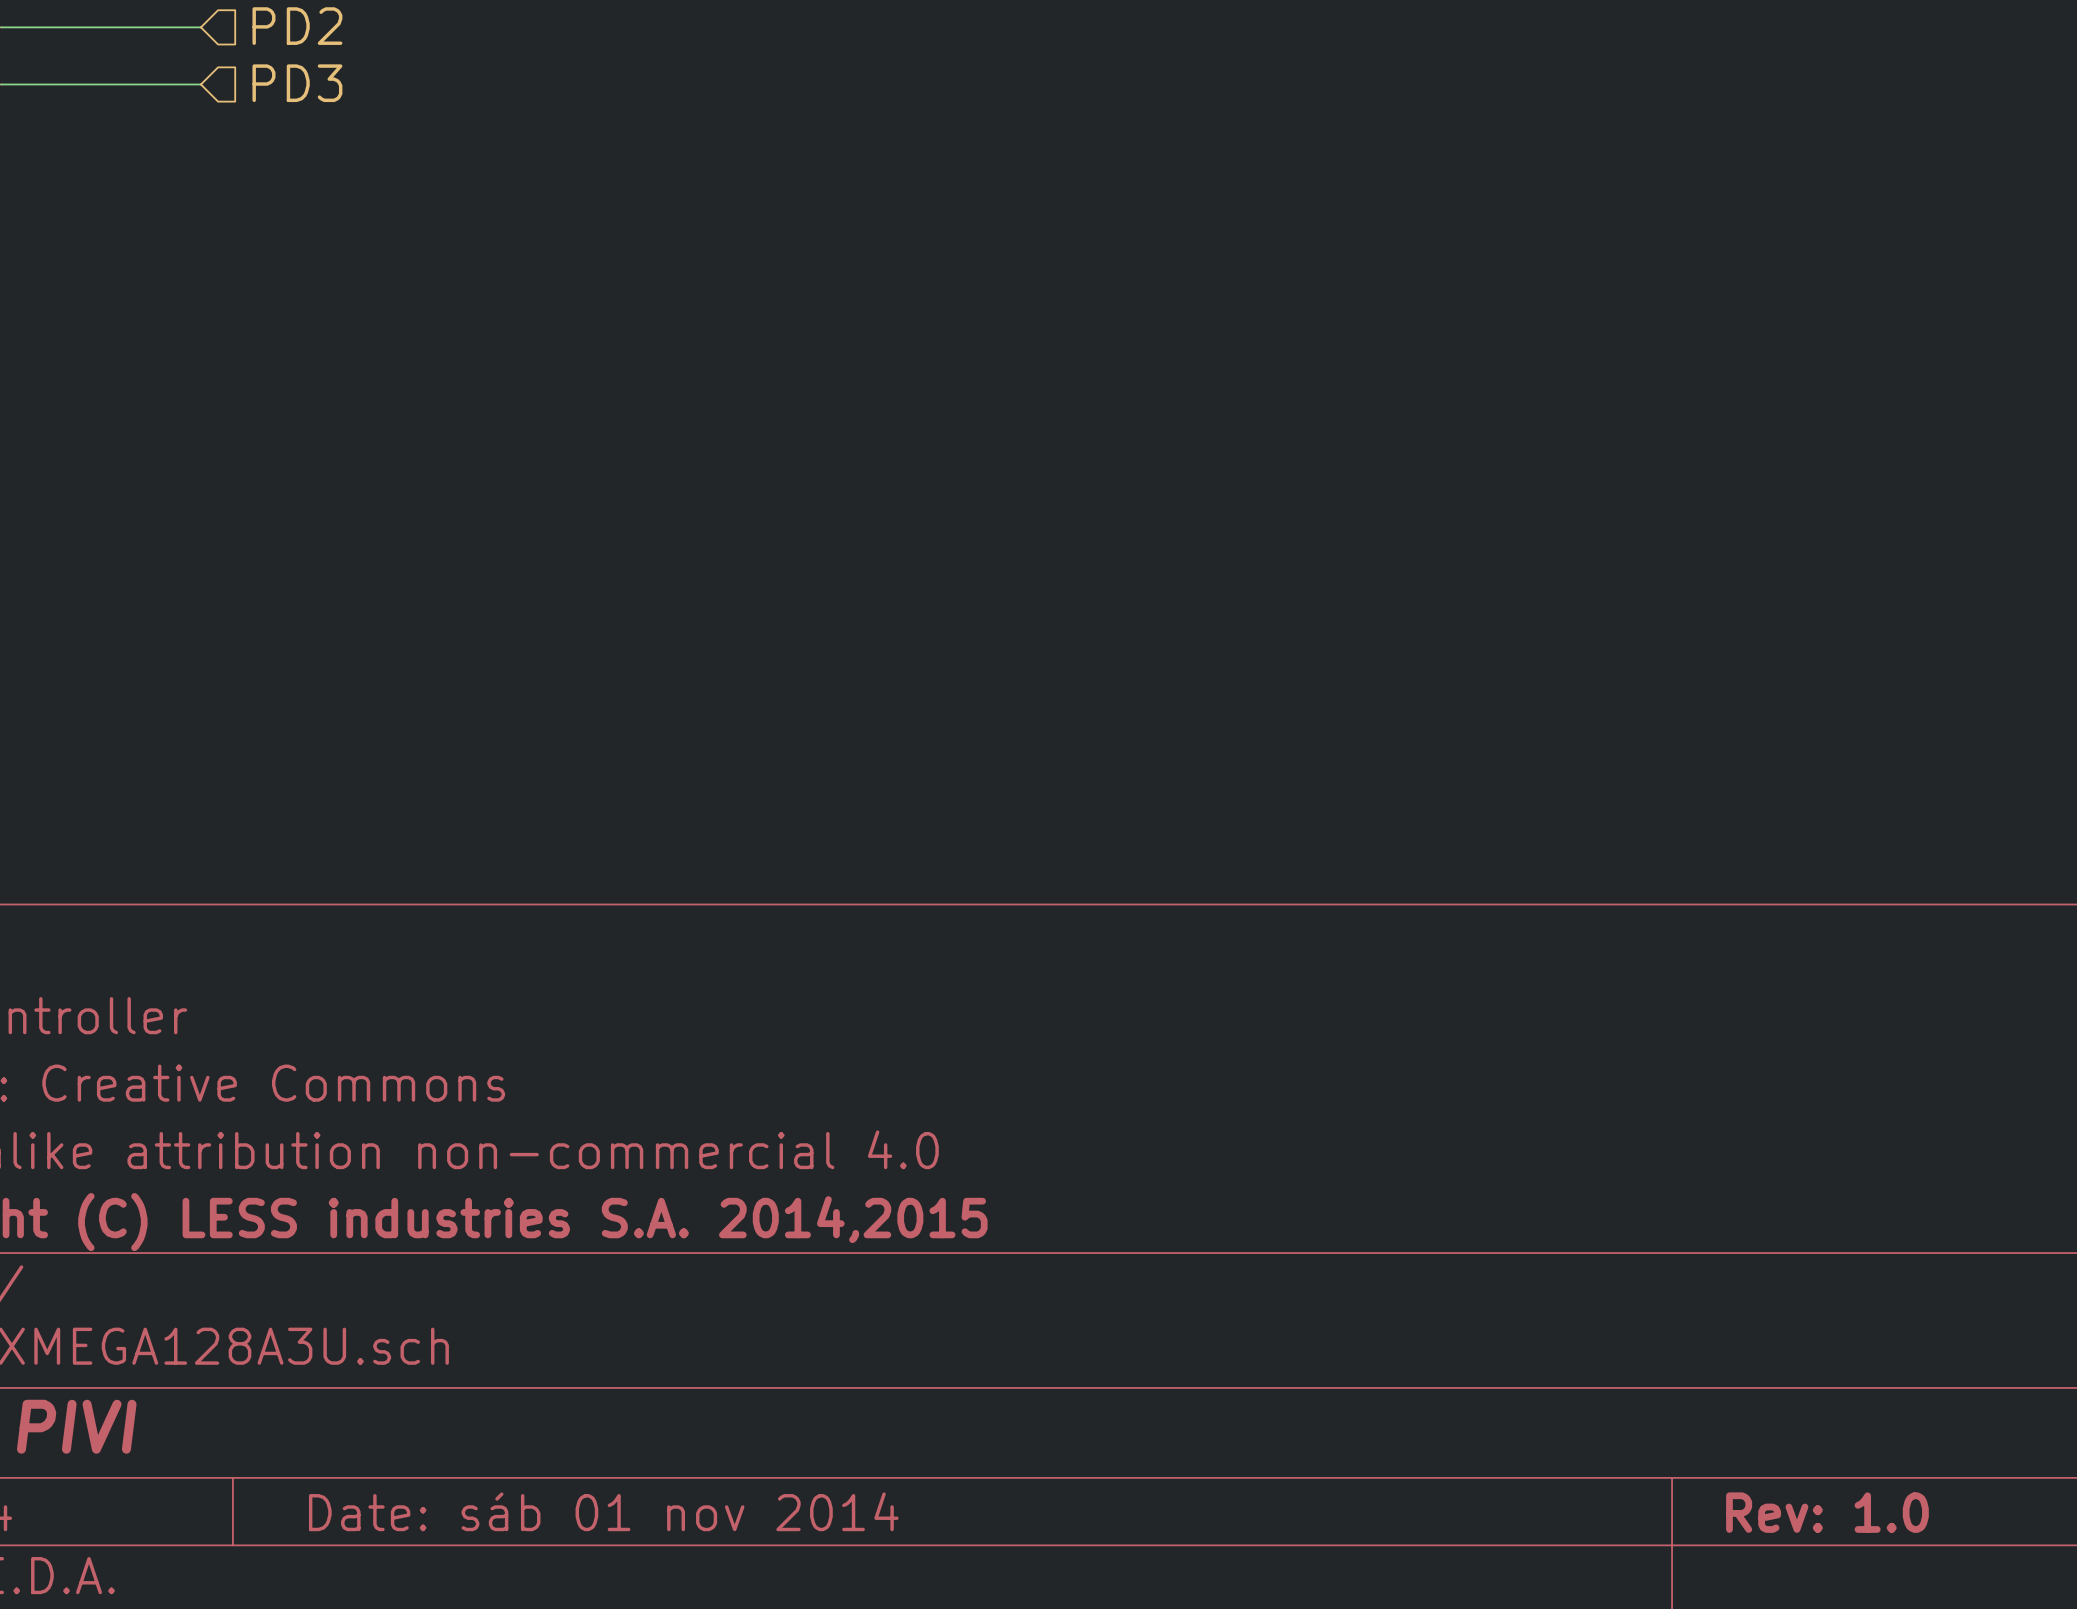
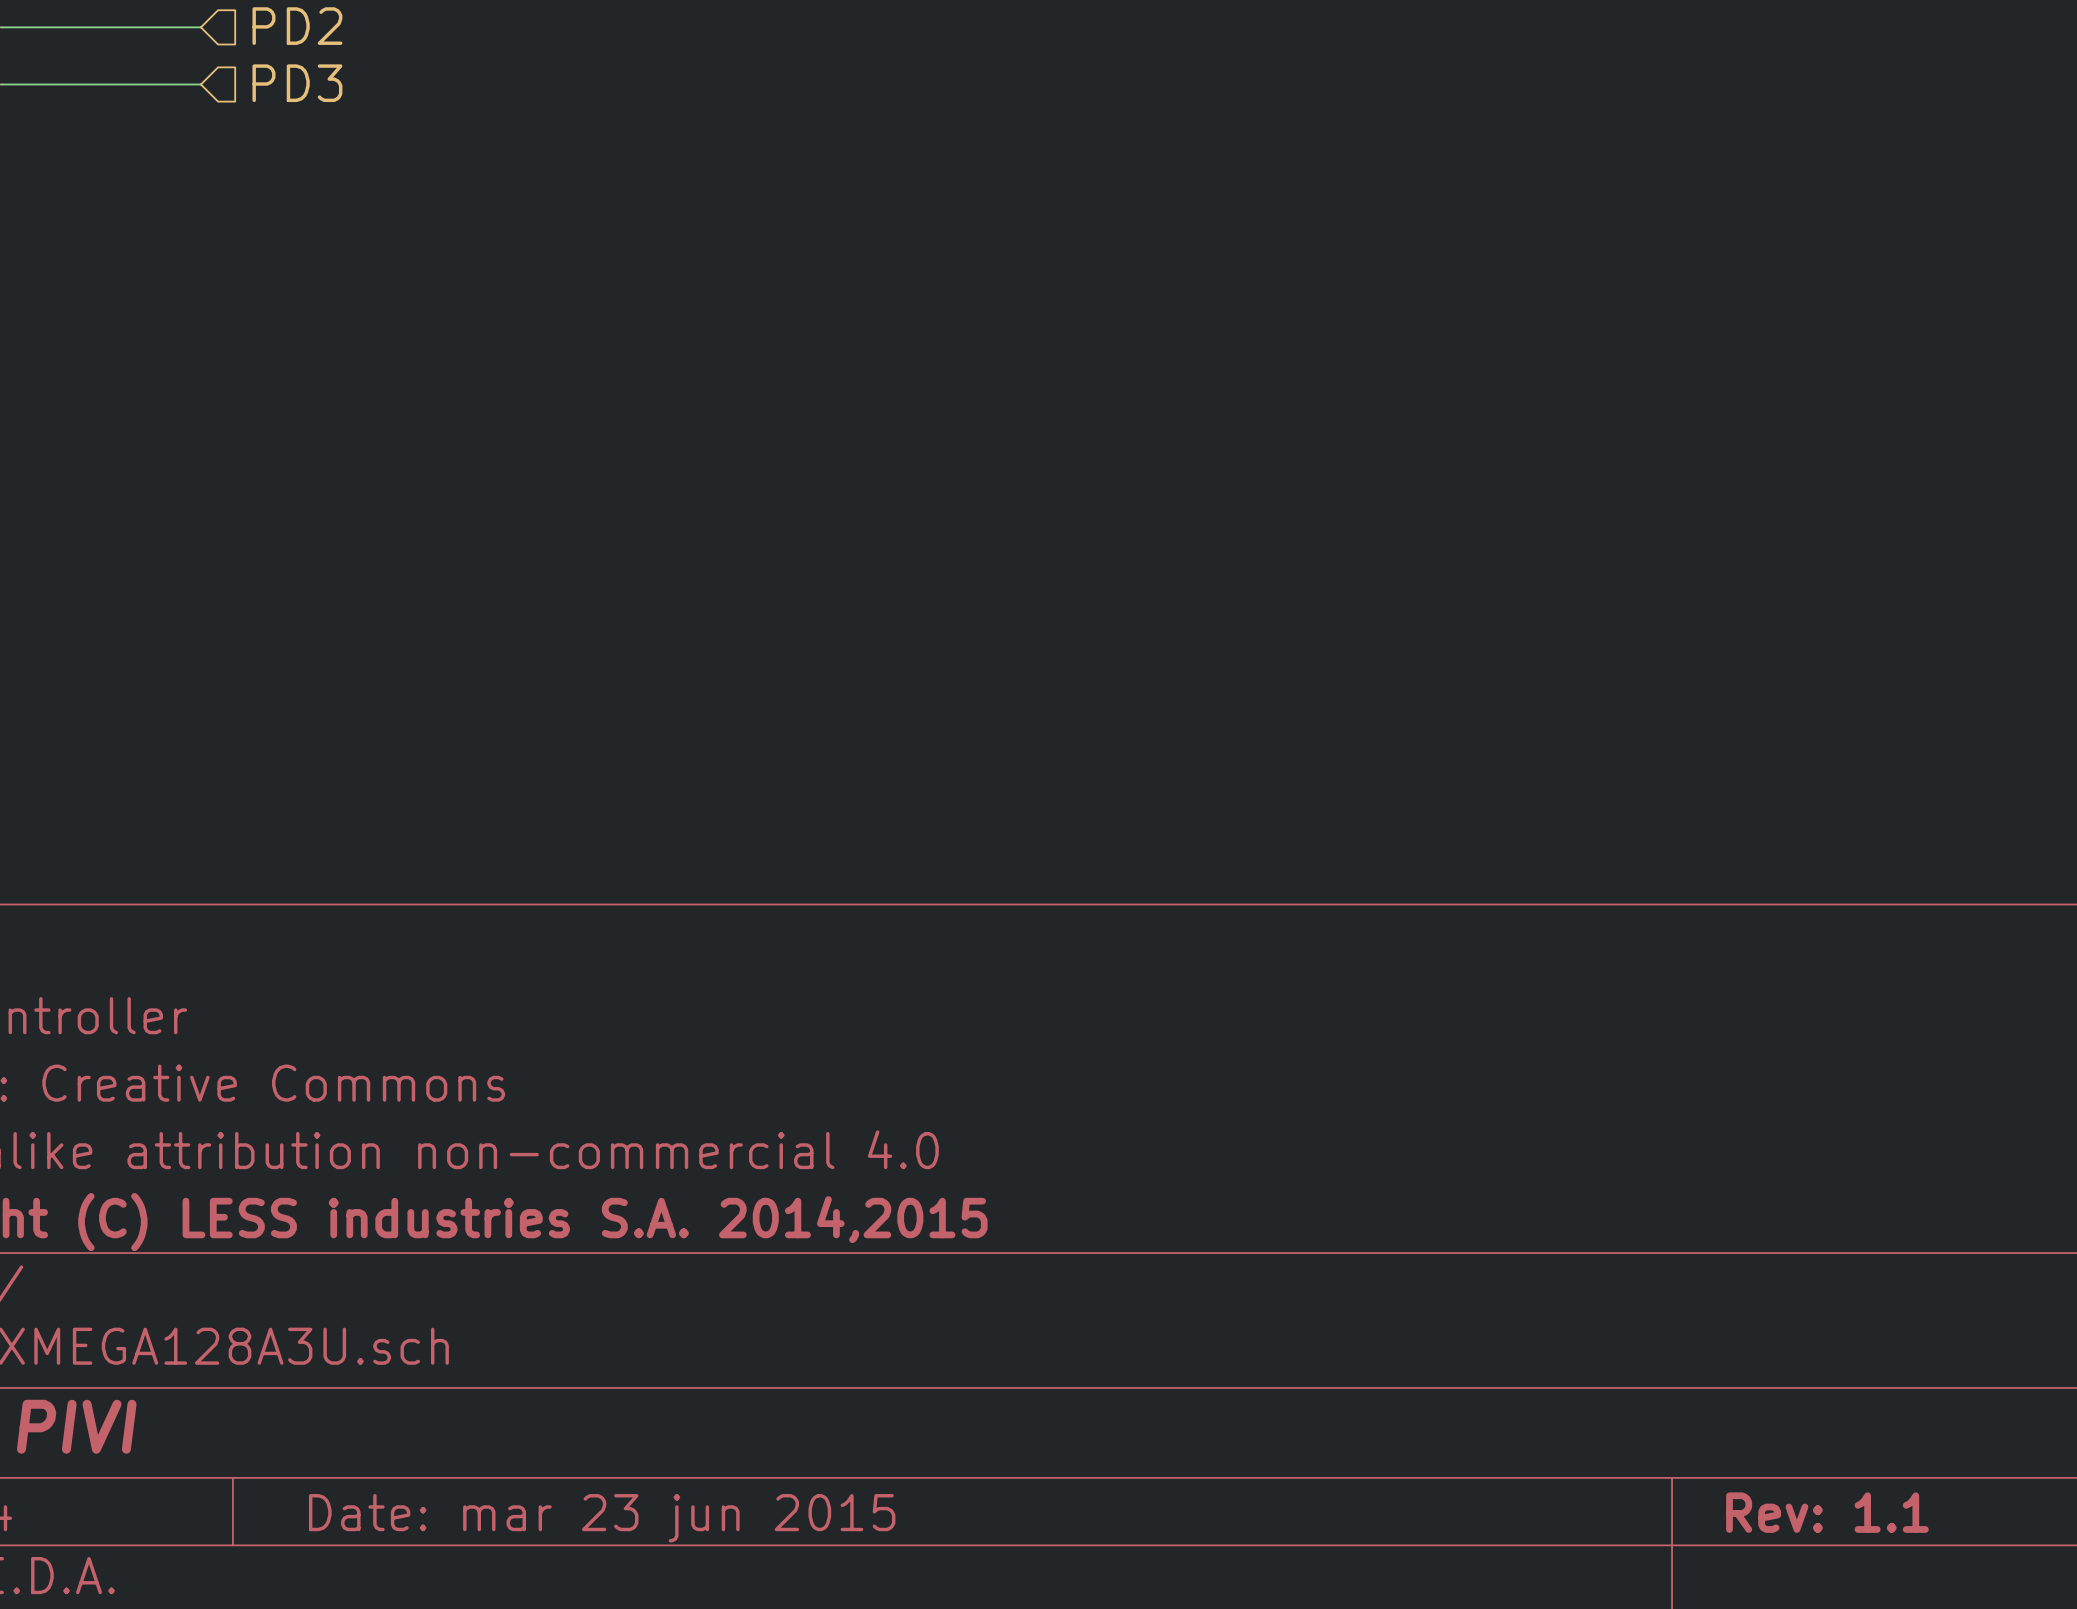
title block: Date: sáb 01 nov 2014 (603, 1511) -> Date: mar 23 jun 2015 (602, 1518)
title block: Rev: 1.0 (1827, 1512) -> Rev: 1.1 (1827, 1512)

